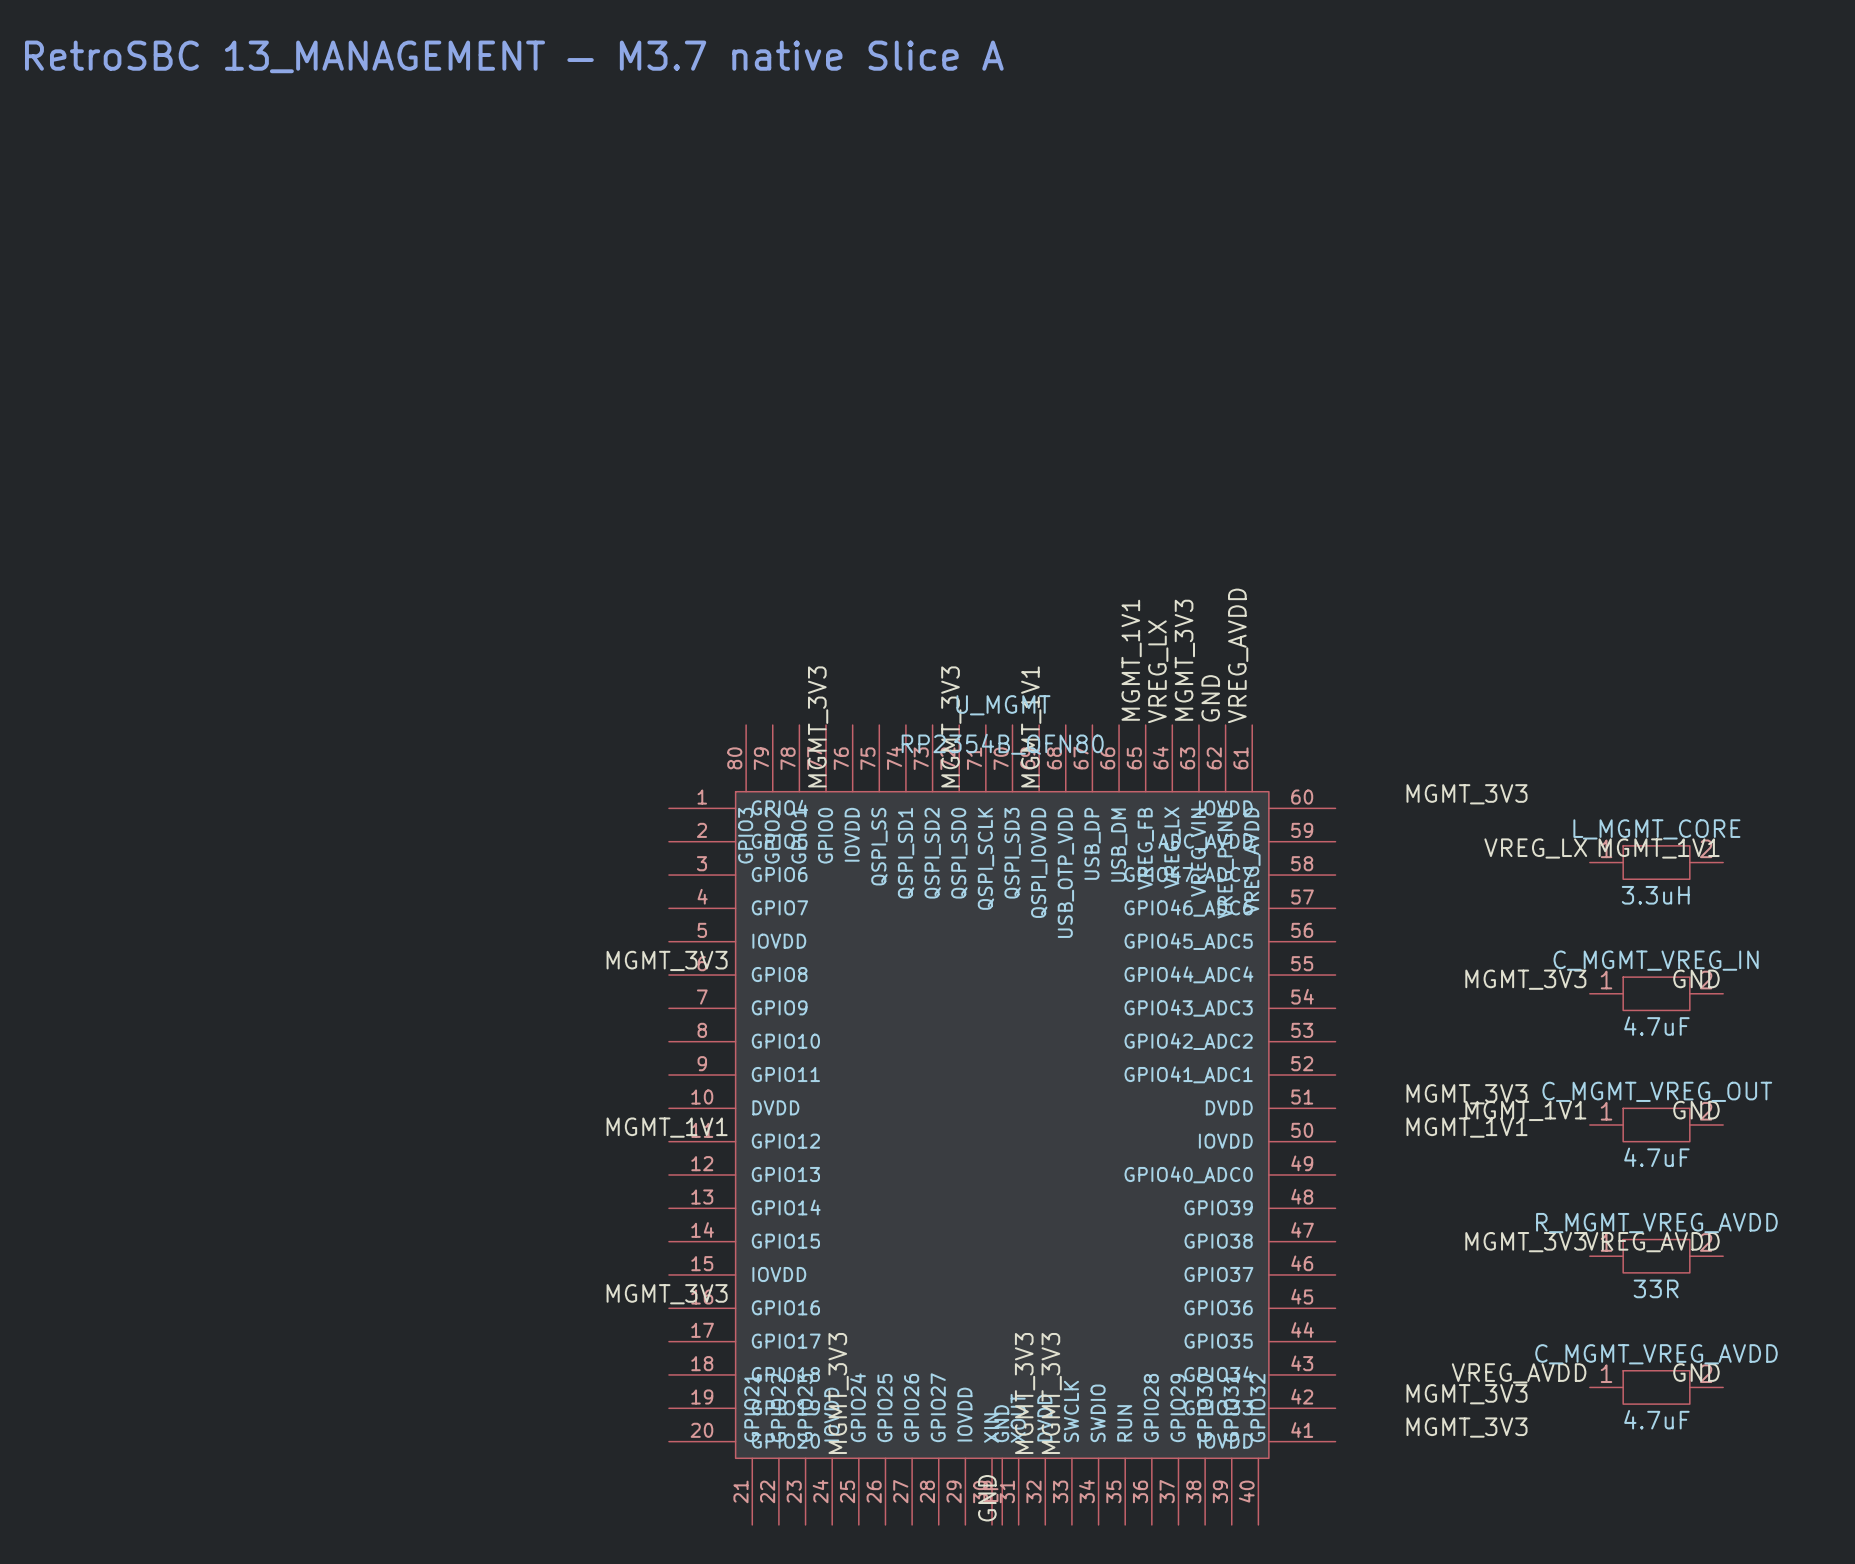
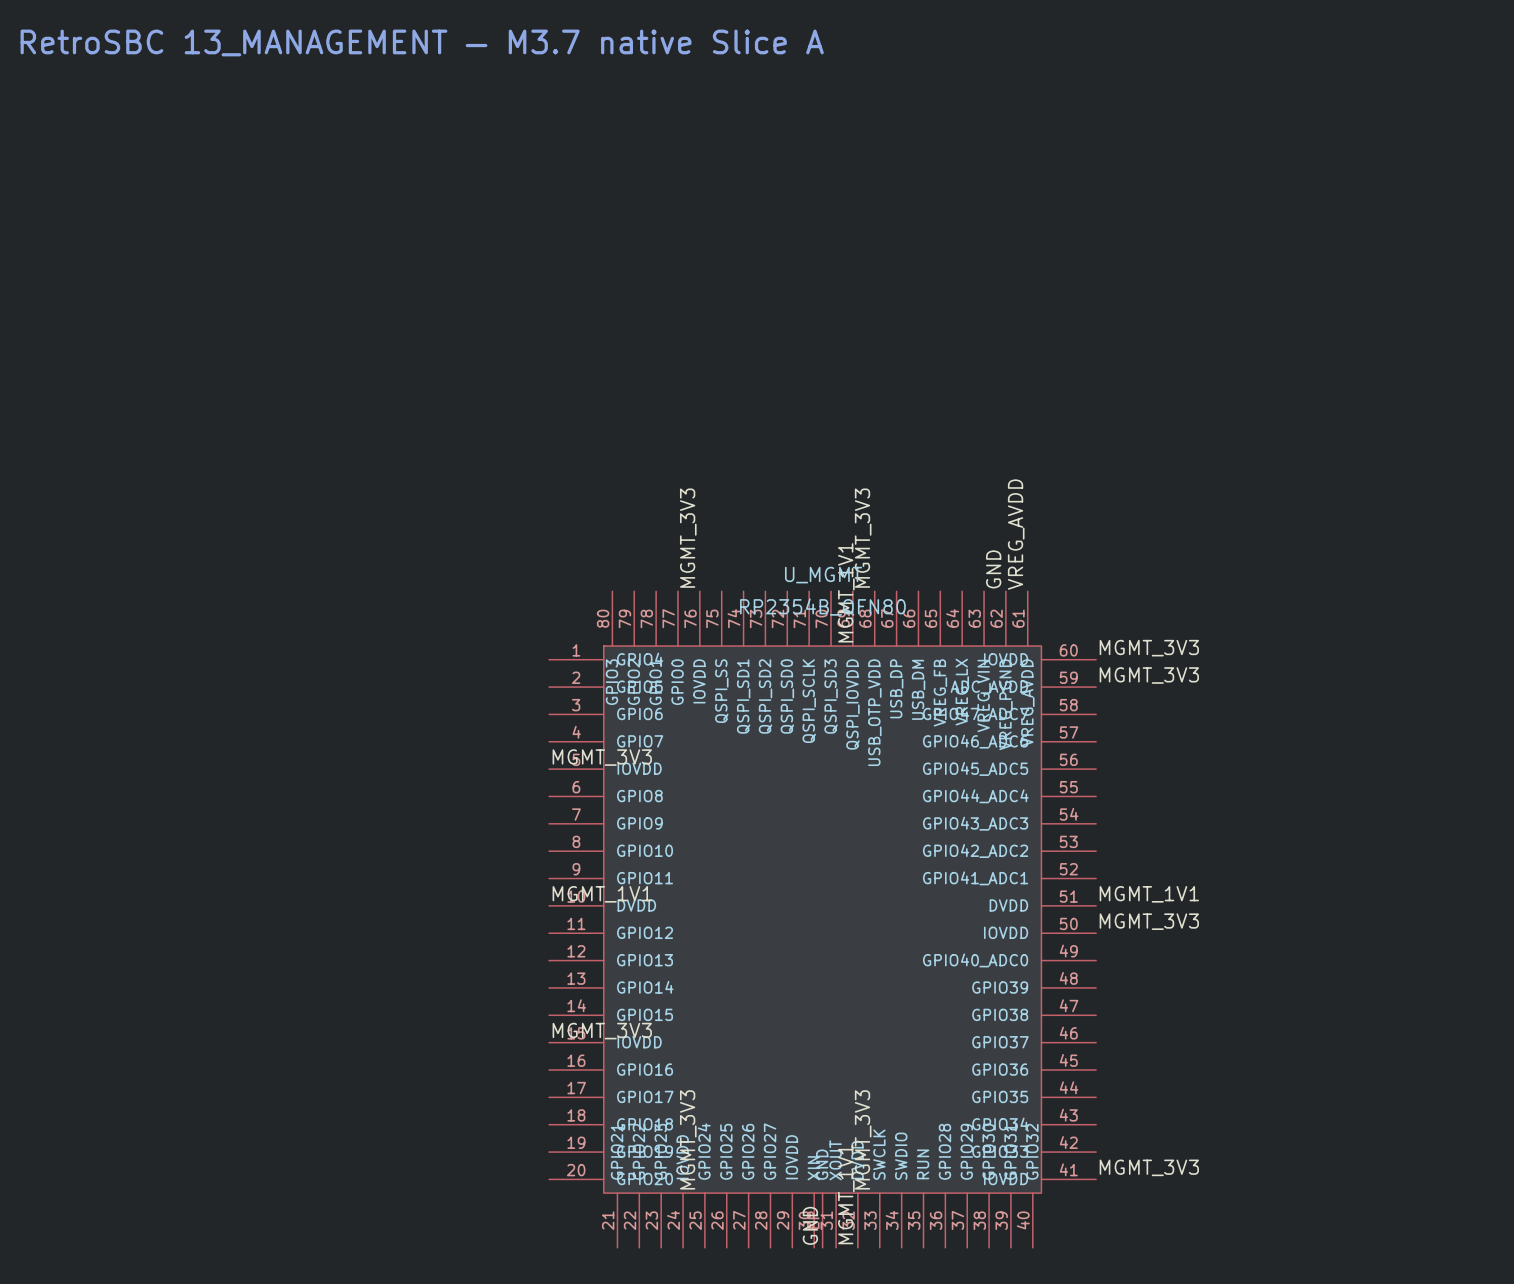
label: none -> MGMT_3V3 (863, 538)
label: MGMT_1V1 (1131, 660) -> none
label: MGMT_3V3 (1184, 660) -> none
label: VREG_LX (1158, 671) -> none
label position: MGMT_3V3 (818, 726) -> MGMT_3V3 (688, 538)
label: MGMT_3V3 (951, 726) -> none
label: none -> MGMT_3V3 (1149, 648)
label: MGMT_3V3 (1467, 794) -> none
label: none -> MGMT_3V3 (1149, 675)
label: VREG_LX (1535, 848) -> none
label: MGMT_1V1 (1659, 848) -> none
L_MGMT_CORE: 3.3uH (1656, 862) -> none
label position: MGMT_3V3 (667, 960) -> MGMT_3V3 (602, 757)
label: GND (1696, 978) -> none
label: MGMT_3V3 (1525, 979) -> none
C_MGMT_VREG_IN: 4.7uF (1656, 993) -> none
label position: MGMT_3V3 (1467, 1094) -> MGMT_3V3 (1149, 921)
label: MGMT_1V1 (1525, 1110) -> none
label: GND (1696, 1110) -> none
C_MGMT_VREG_OUT: 4.7uF (1656, 1125) -> none
label position: MGMT_1V1 (667, 1127) -> MGMT_1V1 (602, 894)
label position: MGMT_1V1 (1467, 1127) -> MGMT_1V1 (1149, 894)
label: MGMT_3V3 (1525, 1242) -> none
label: VREG_AVDD (1652, 1242) -> none
R_MGMT_VREG_AVDD: 33R (1656, 1256) -> none
label position: MGMT_3V3 (667, 1294) -> MGMT_3V3 (602, 1031)
label: GND (1696, 1372) -> none
label: VREG_AVDD (1519, 1373) -> none
C_MGMT_VREG_AVDD: 4.7uF (1656, 1387) -> none
label: MGMT_3V3 (1025, 1393) -> MGMT_1V1 (846, 1194)
label: MGMT_3V3 (1467, 1394) -> none
label: none -> MGMT_3V3 (1149, 1167)
label: MGMT_3V3 (1467, 1427) -> none

